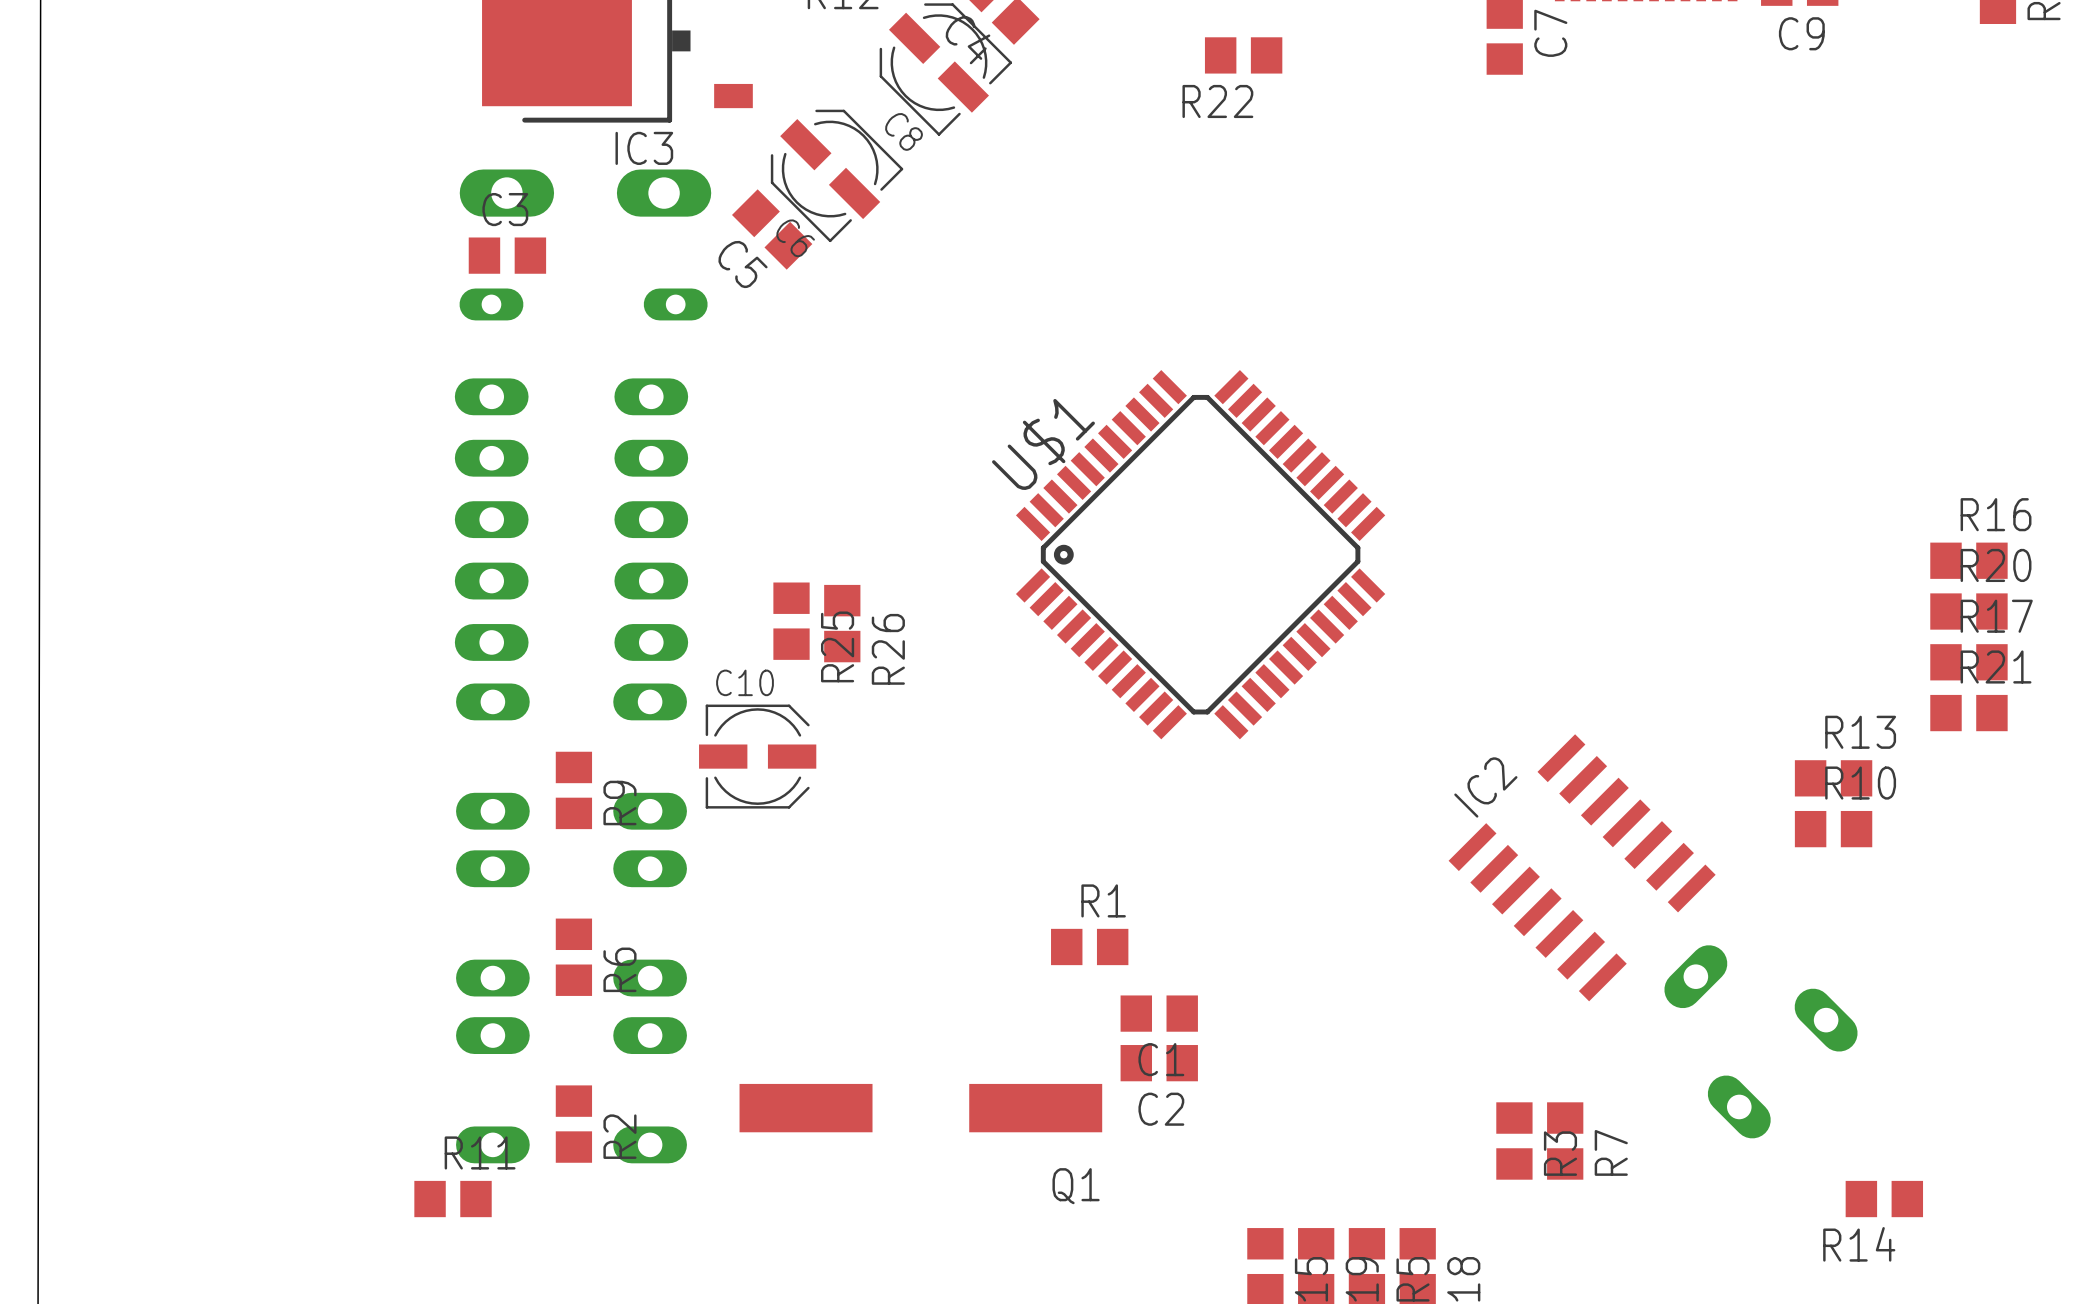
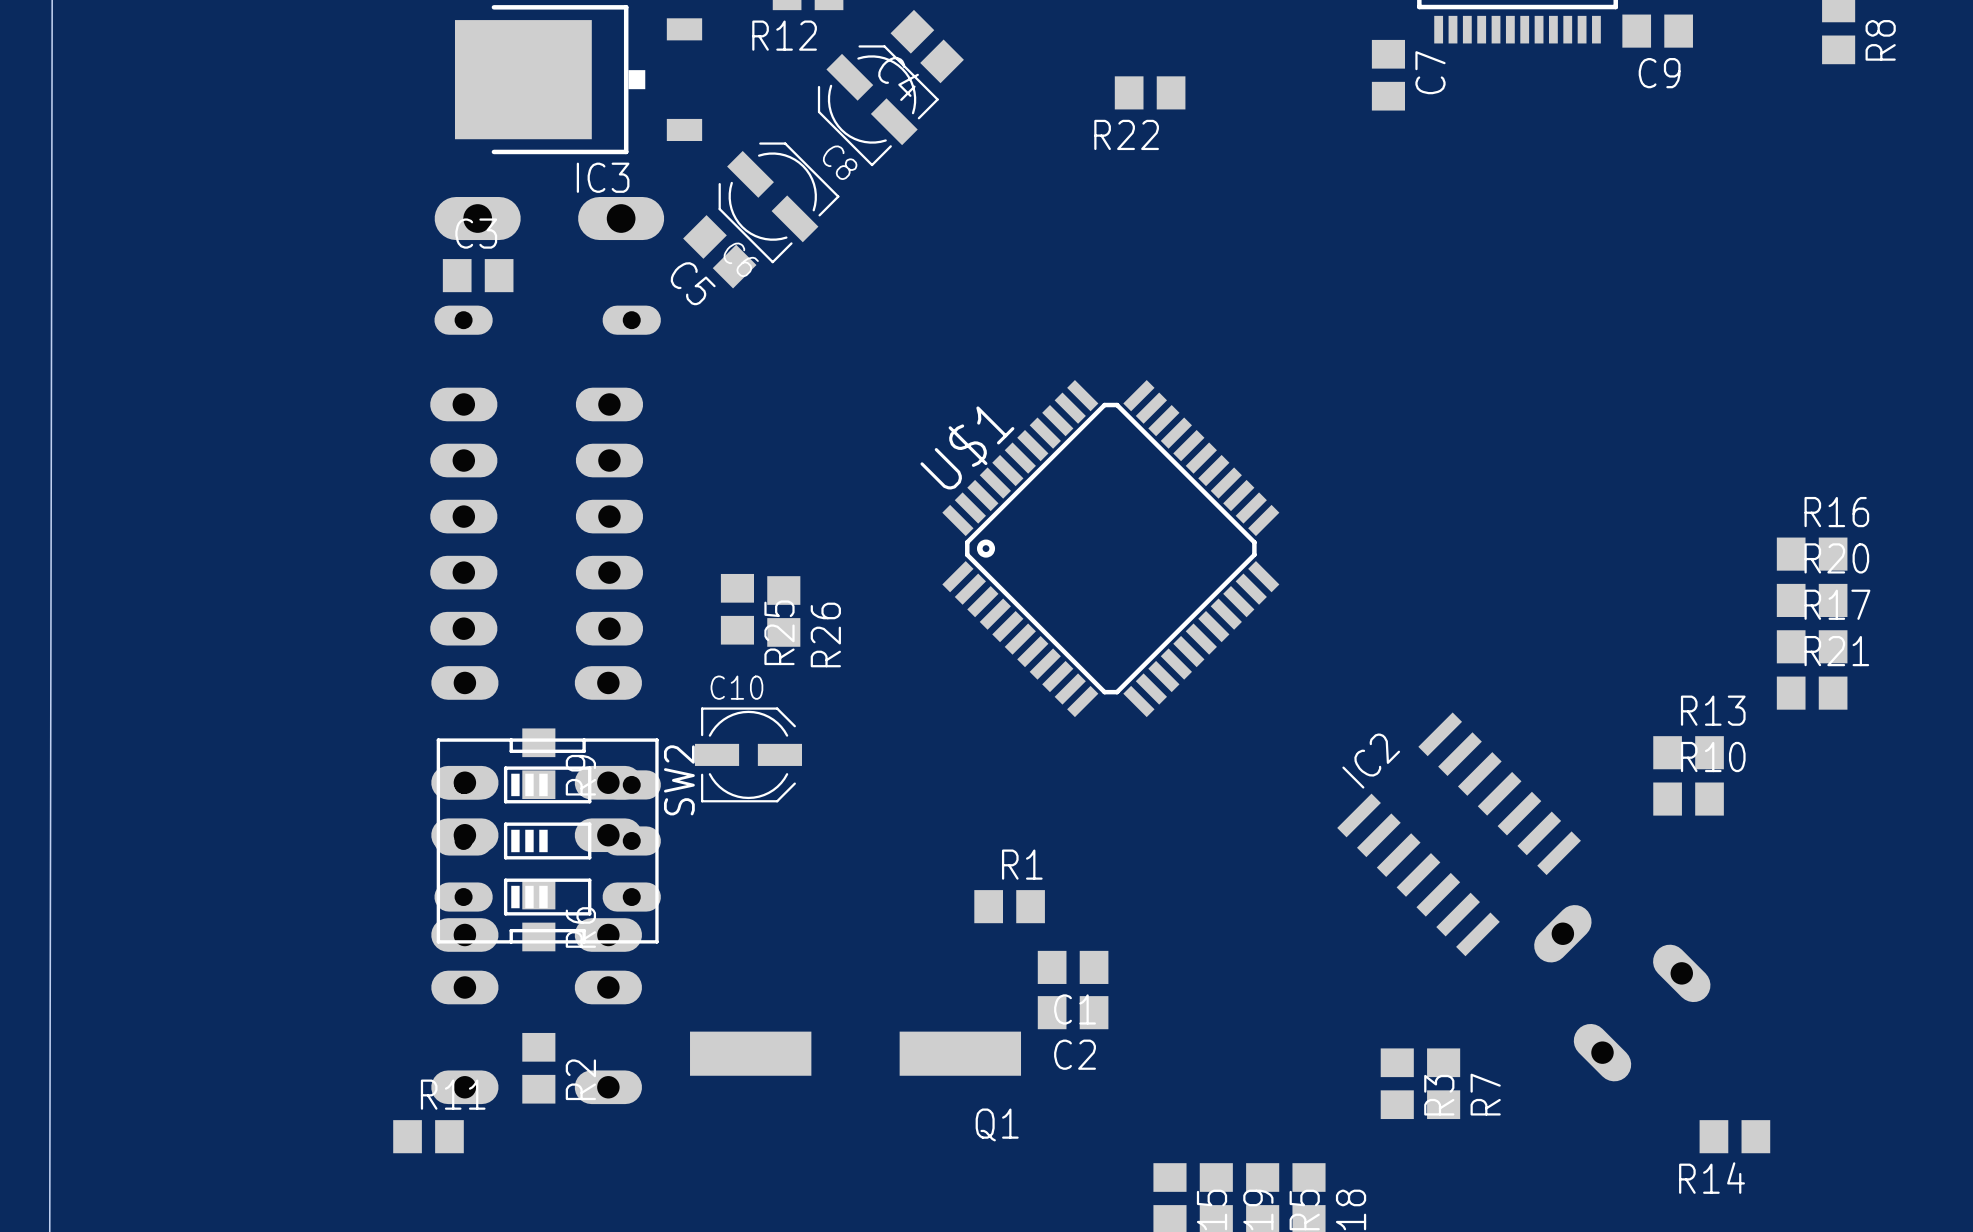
C10 position: (757, 756) -> (748, 754)
SW2: none -> (547, 840)

